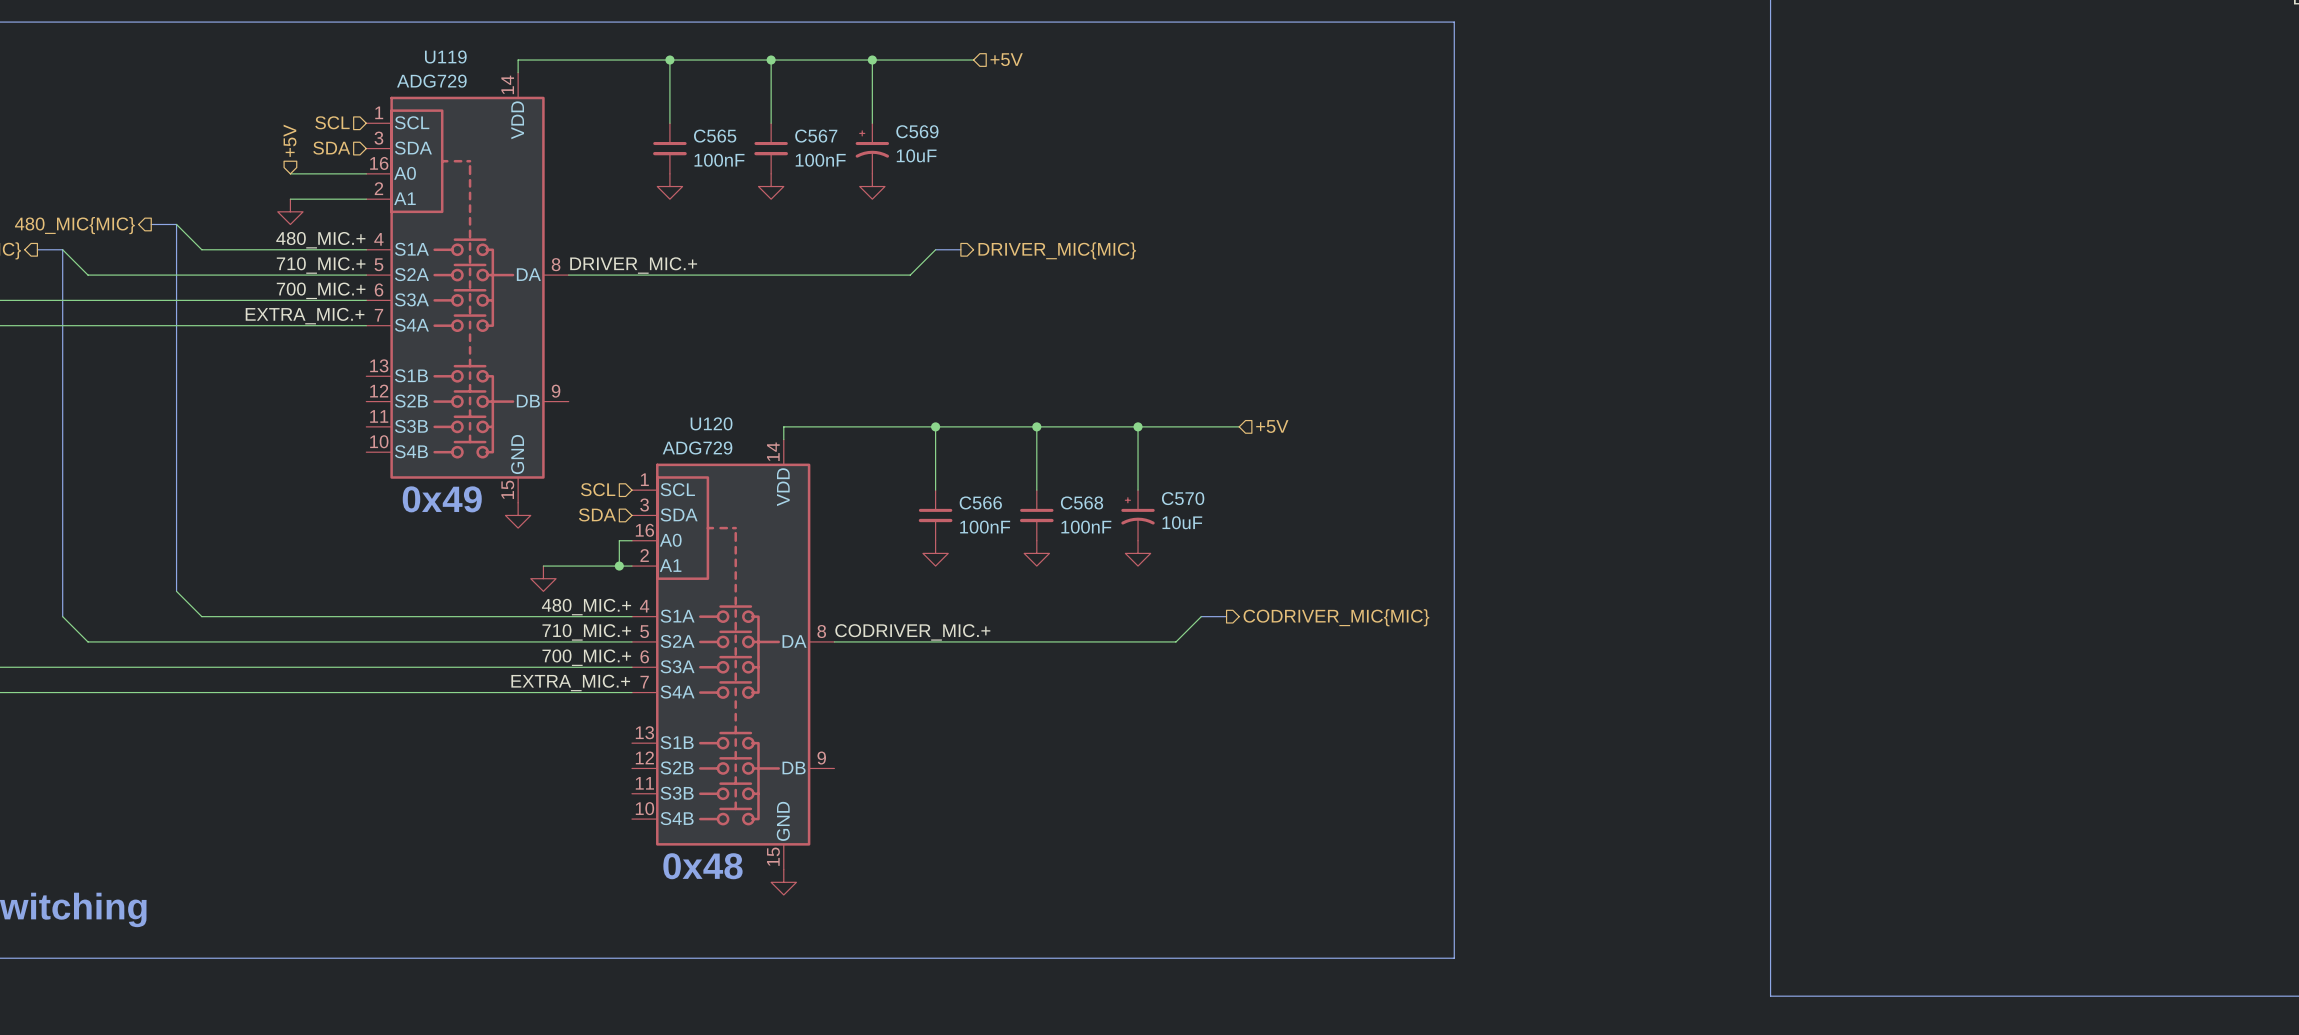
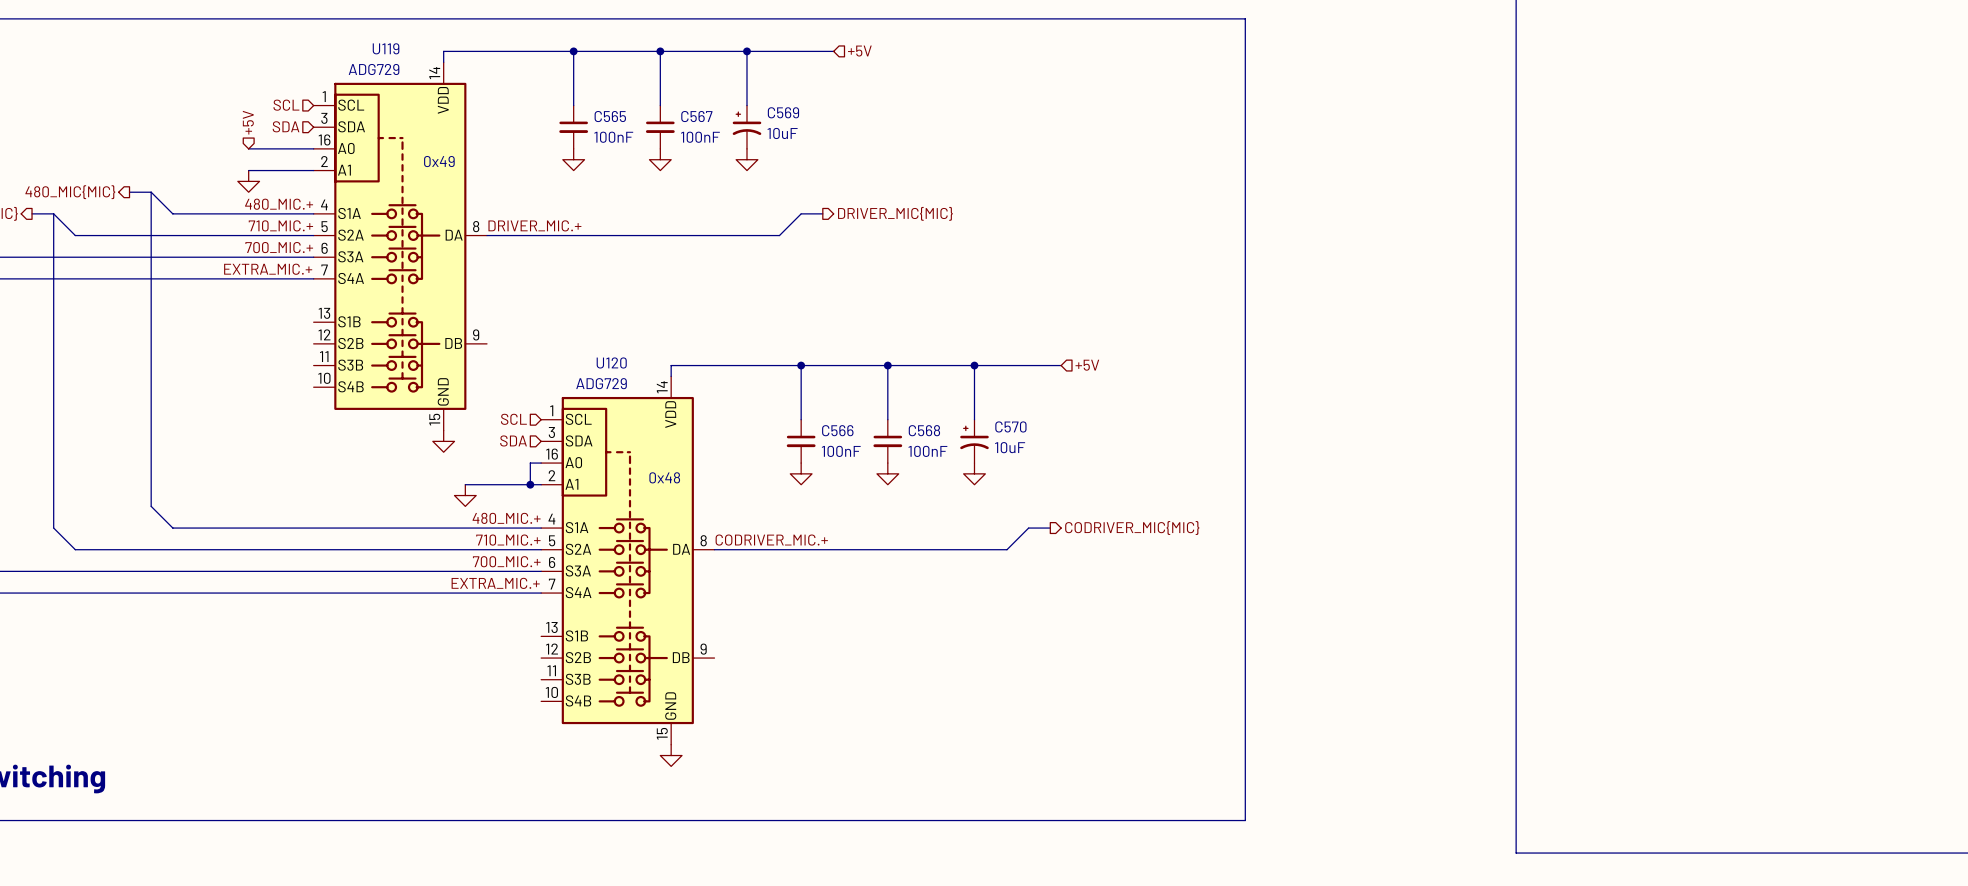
text: none -> 0x49 (439, 161)
text: 0x49 (442, 499) -> none
text: none -> 0x48 (664, 477)
text: 0x48 (702, 866) -> none

